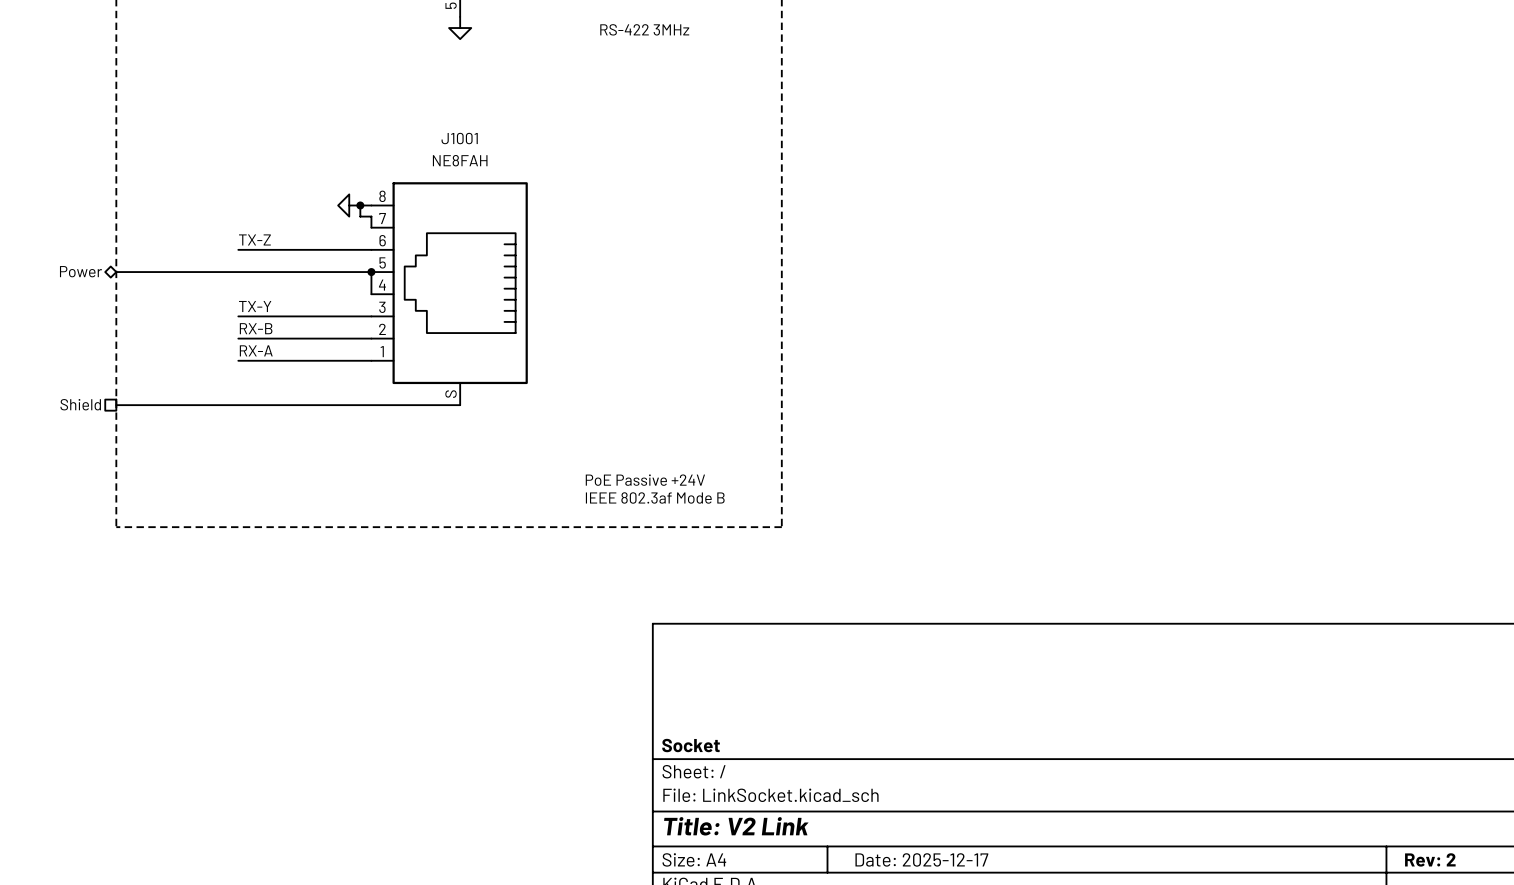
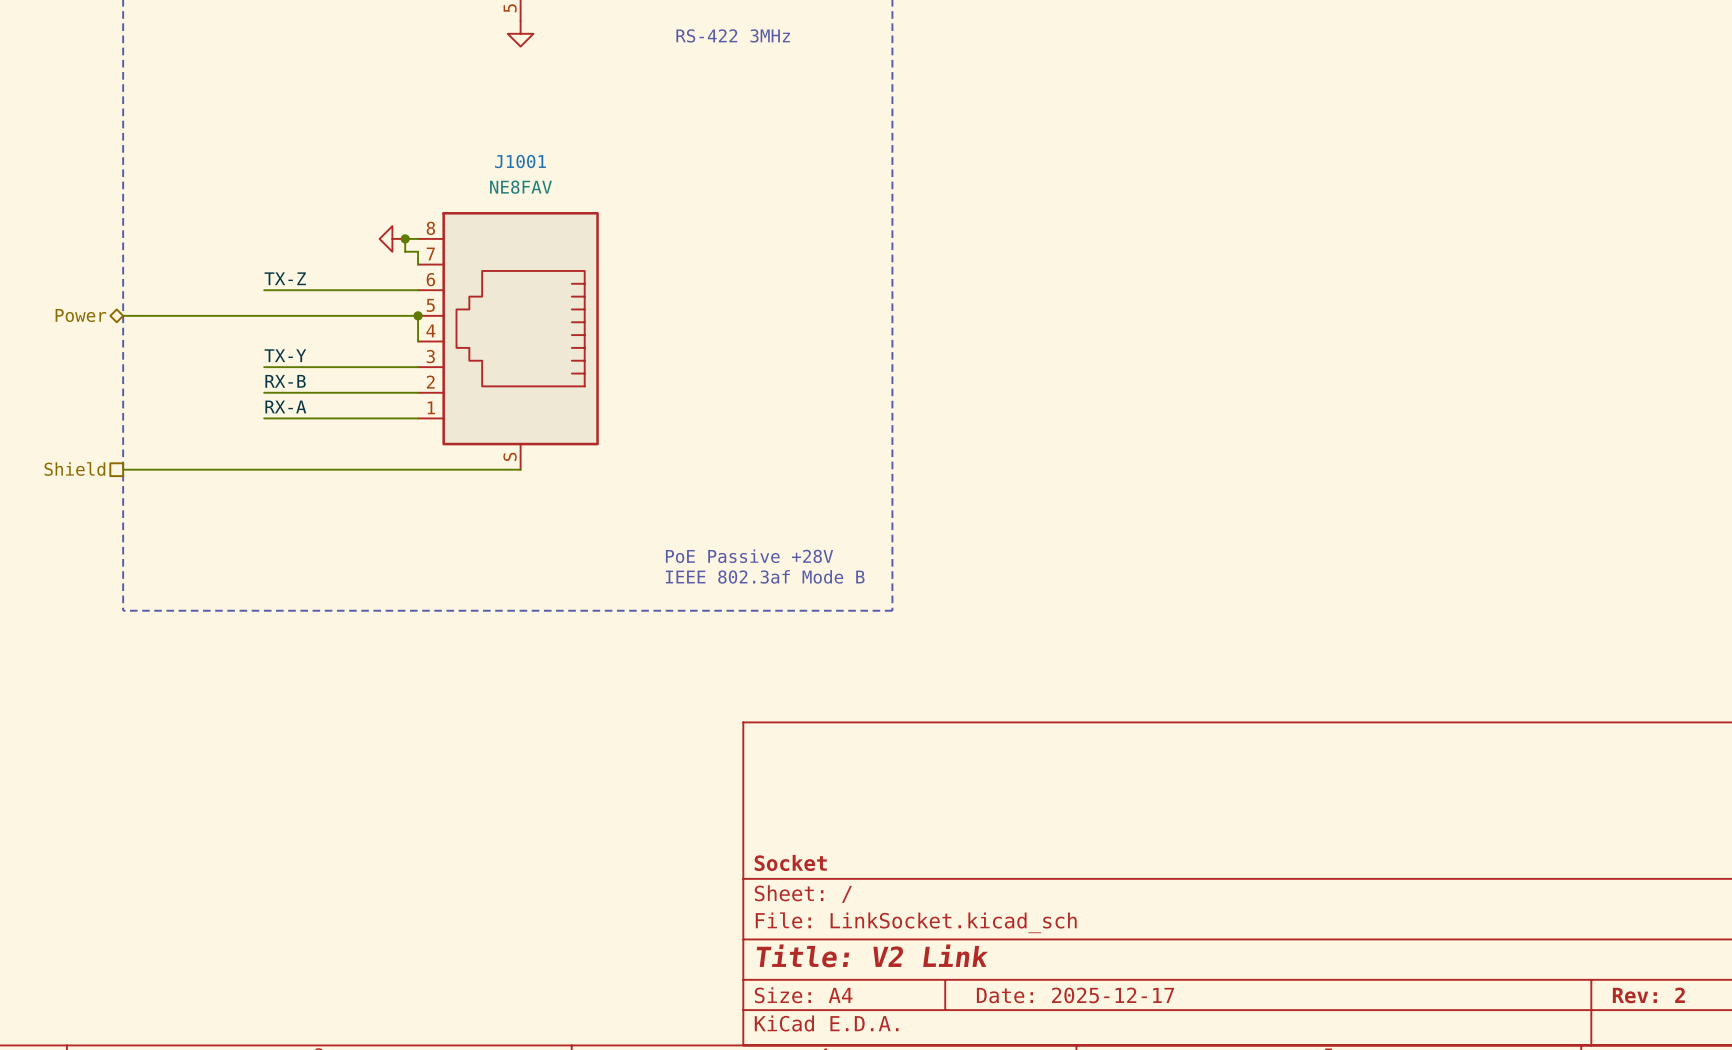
J1001 value: NE8FAH (460, 160) -> NE8FAV (520, 187)
text: PoE Passive +24V (645, 480) -> PoE Passive +28V (749, 556)

